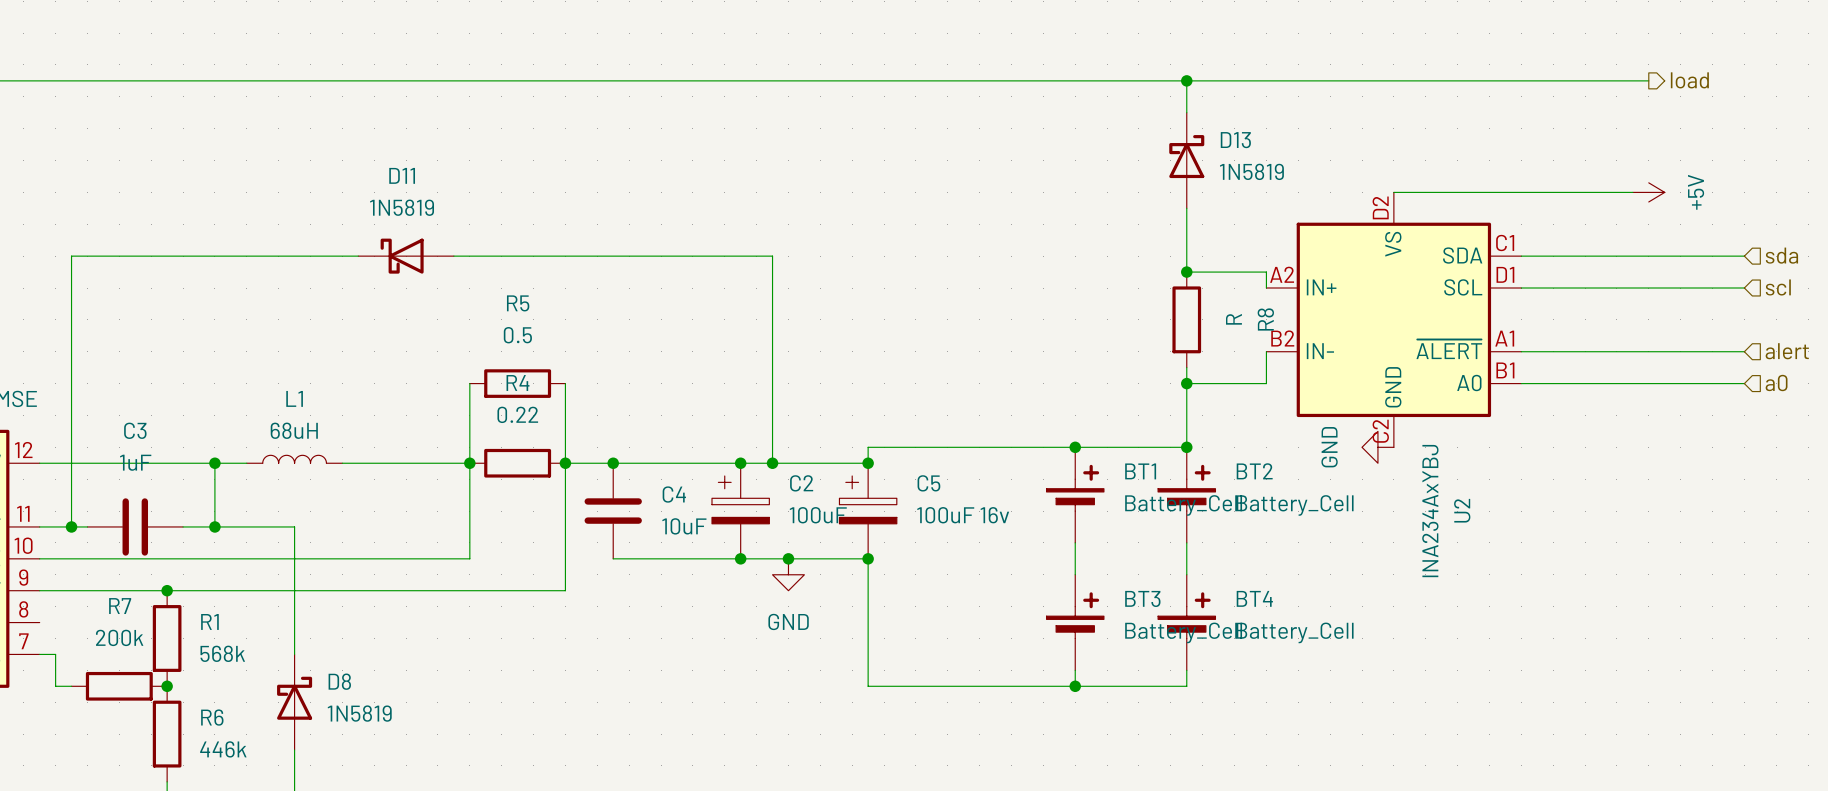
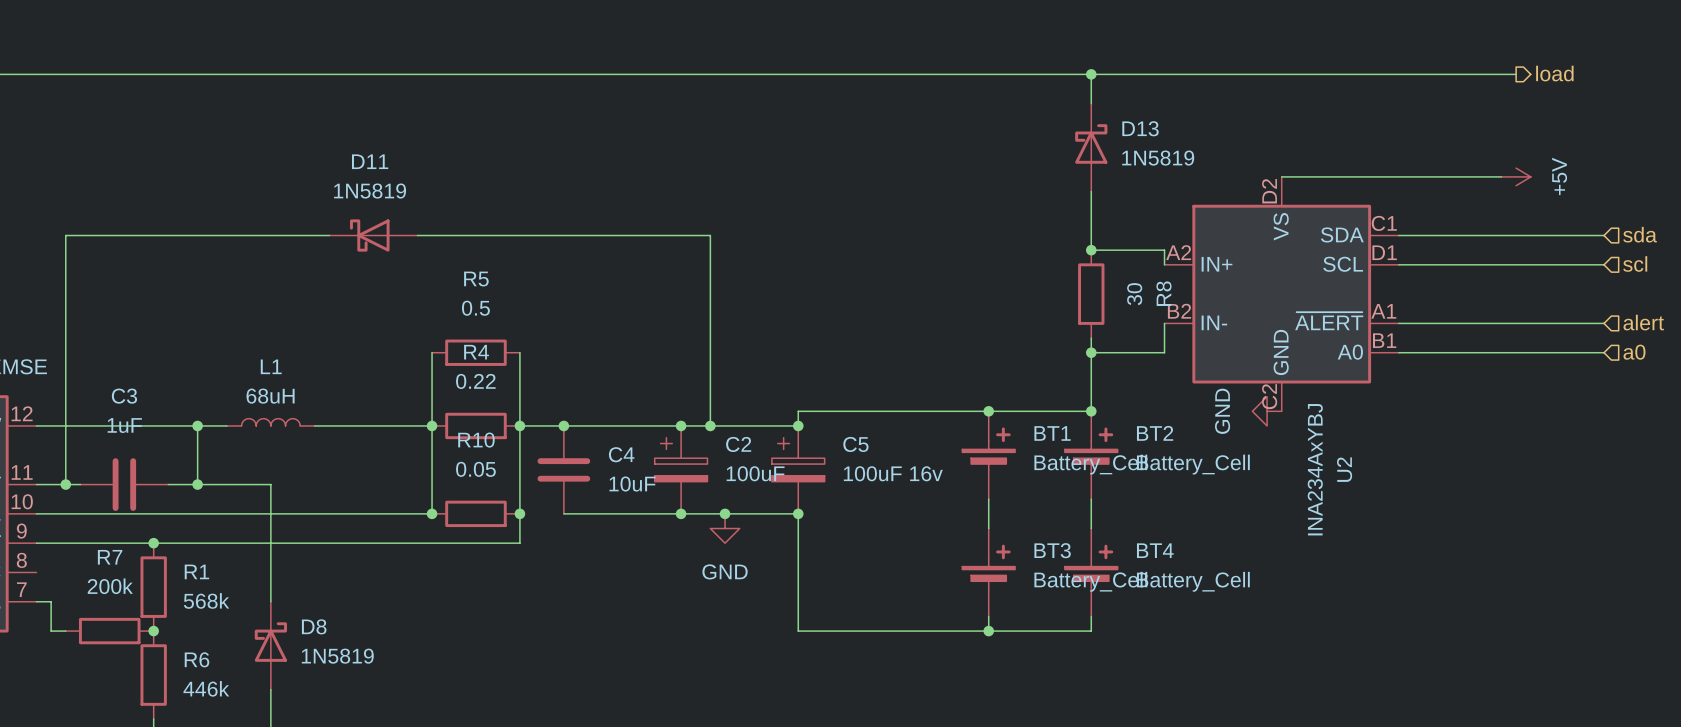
R8 value: R (1233, 319) -> 30 (1134, 294)
junction: none -> (432, 513)
R10: none -> 0.05 (475, 513)
junction: none -> (519, 513)

